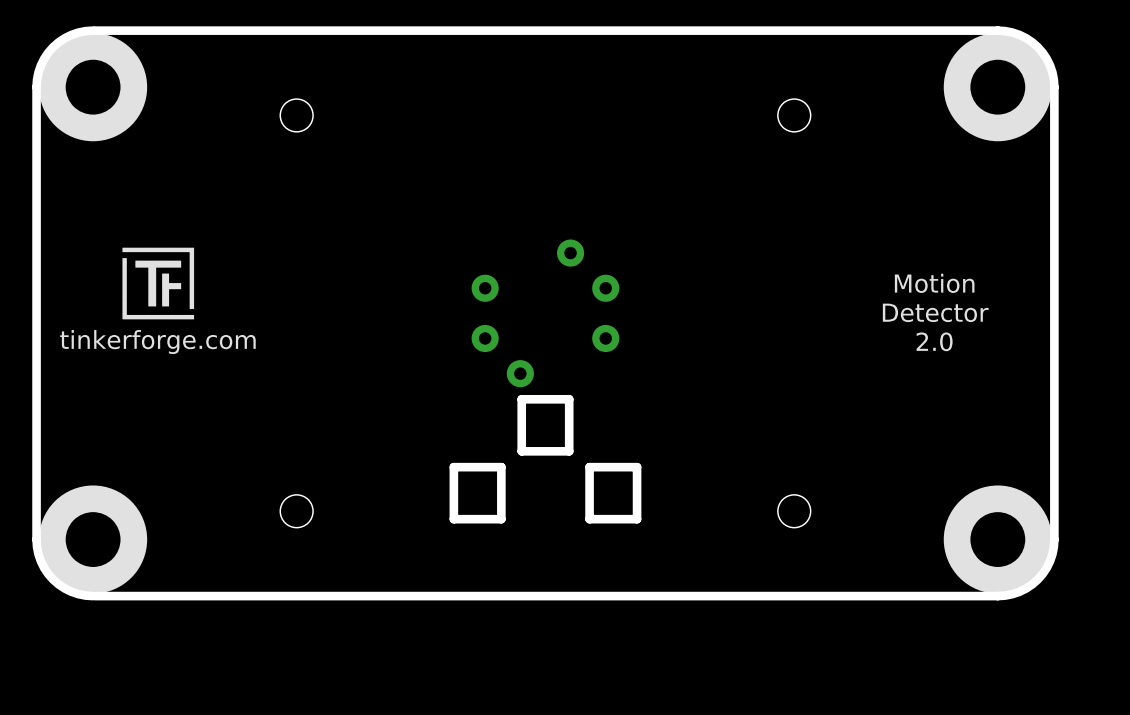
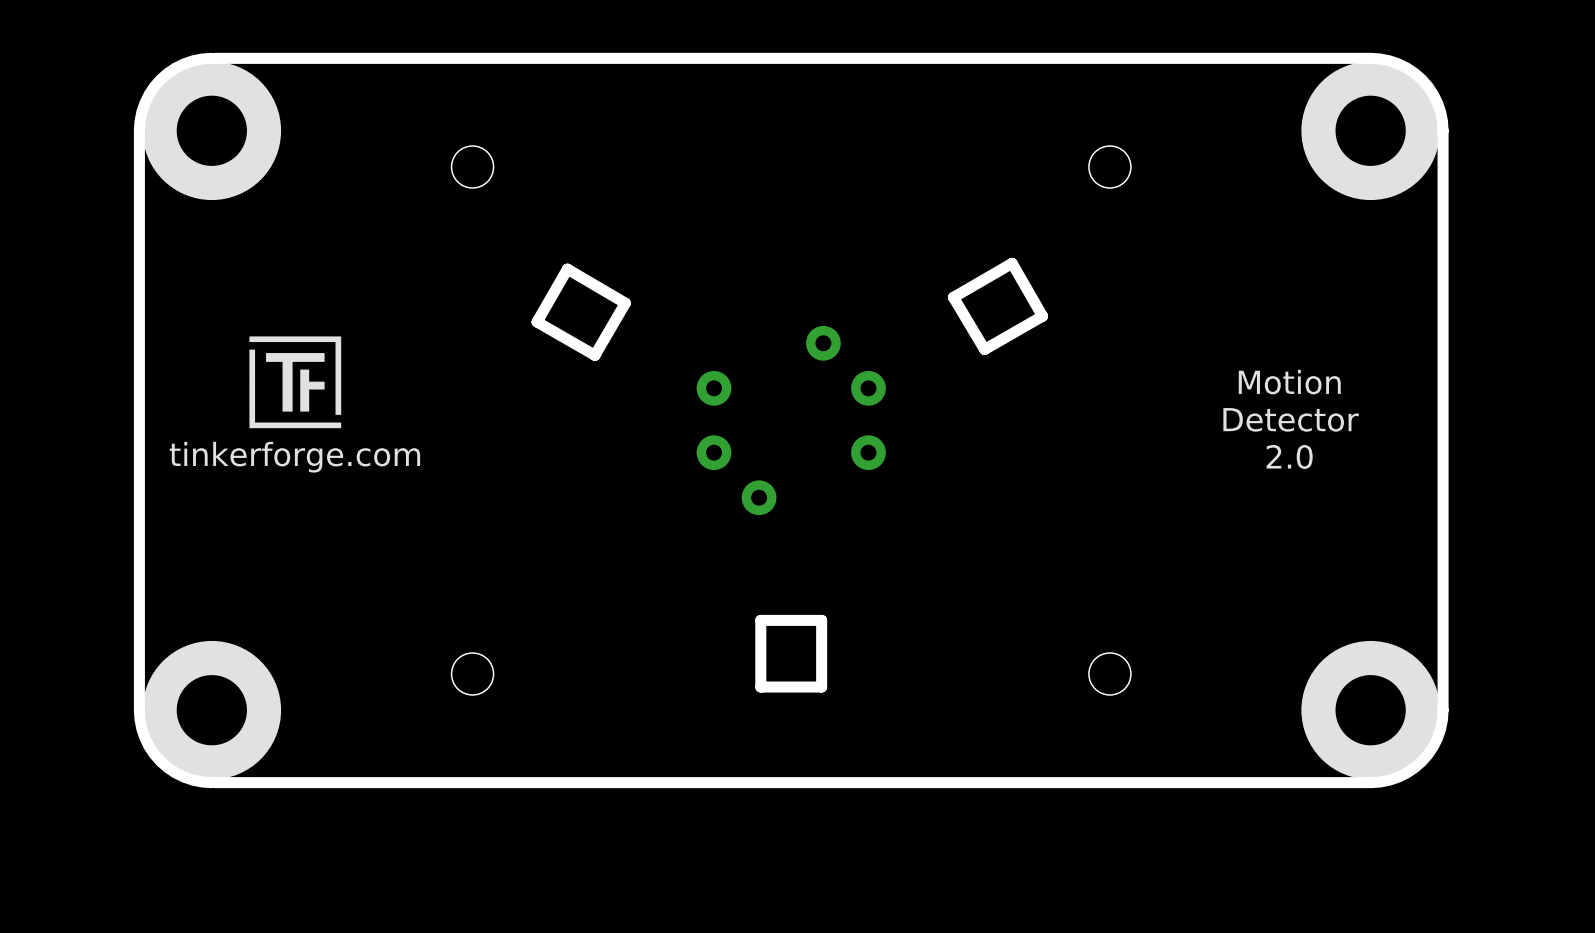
board edge: none -> (1012, 263) (953, 297) (984, 349) (1042, 316) (1012, 263)
board edge: none -> (567, 269) (537, 322) (594, 355) (625, 303) (567, 269)
board edge: (569, 399) (569, 451) (521, 451) (521, 399) (569, 399) -> none
board edge: (501, 467) (453, 467) (453, 519) (501, 519) (501, 467) -> none
board edge: (637, 467) (589, 467) (589, 519) (637, 519) (637, 467) -> (821, 620) (760, 620) (760, 687) (821, 687) (821, 620)

